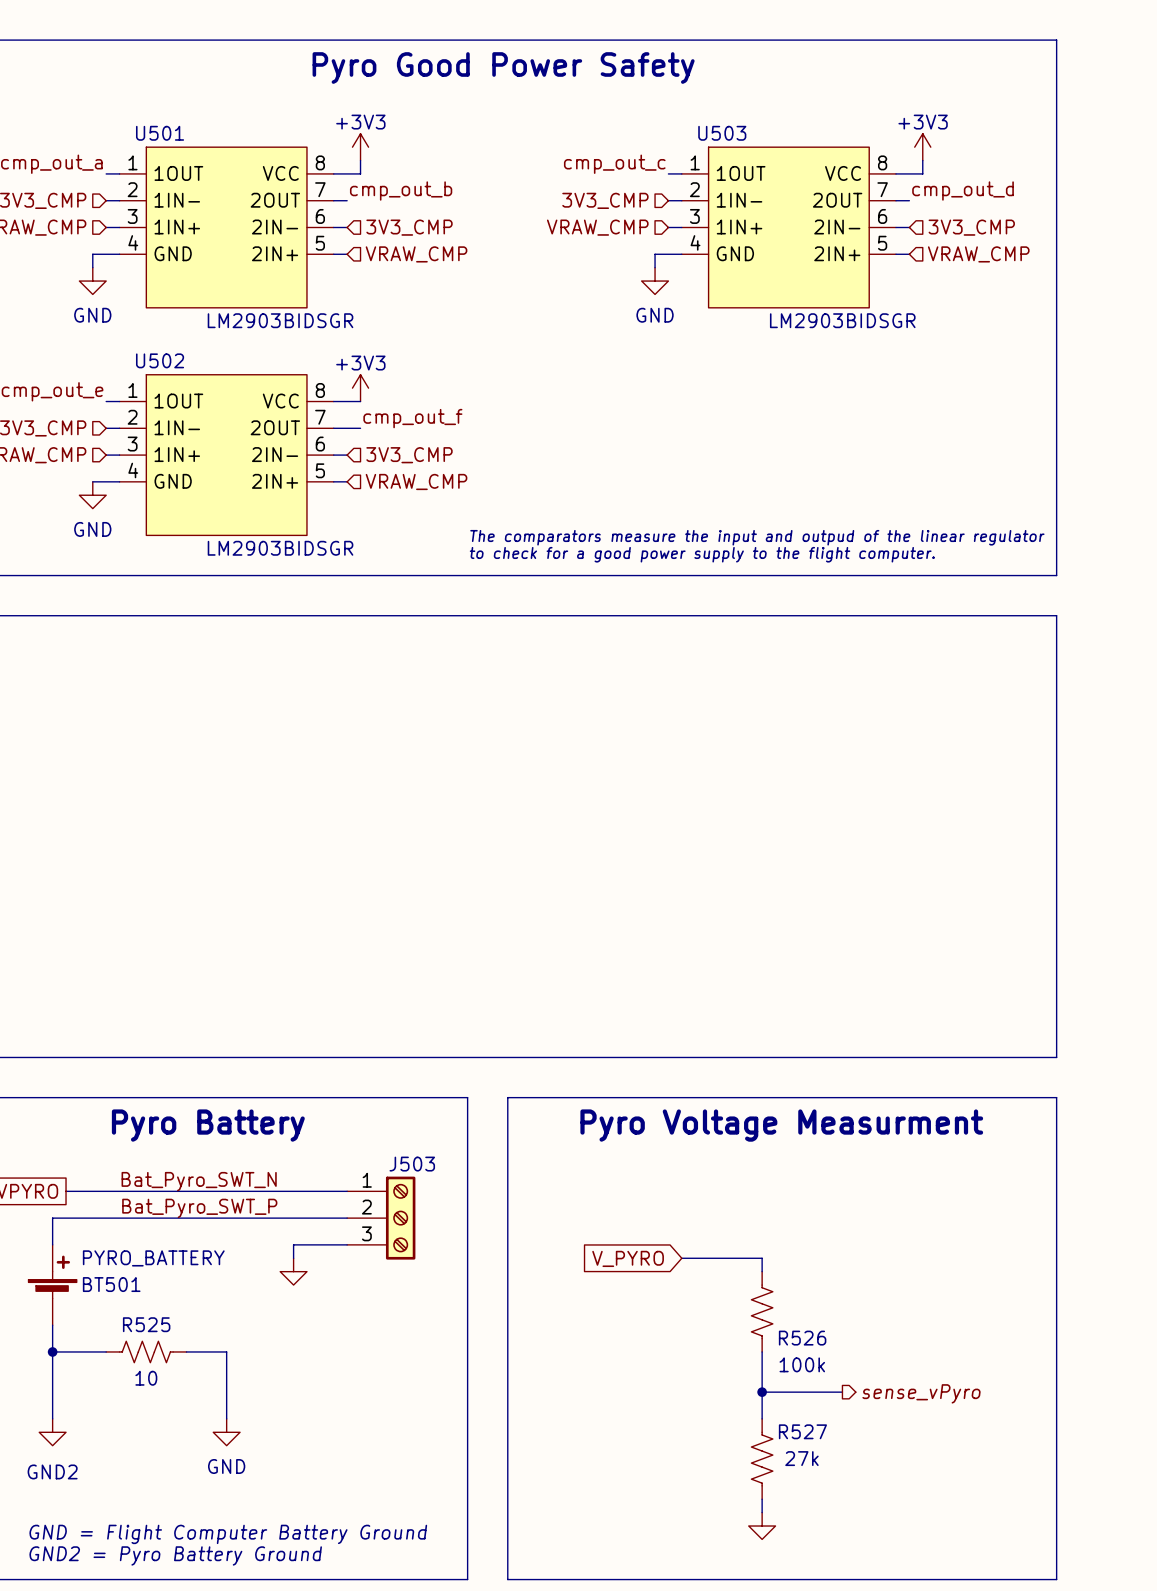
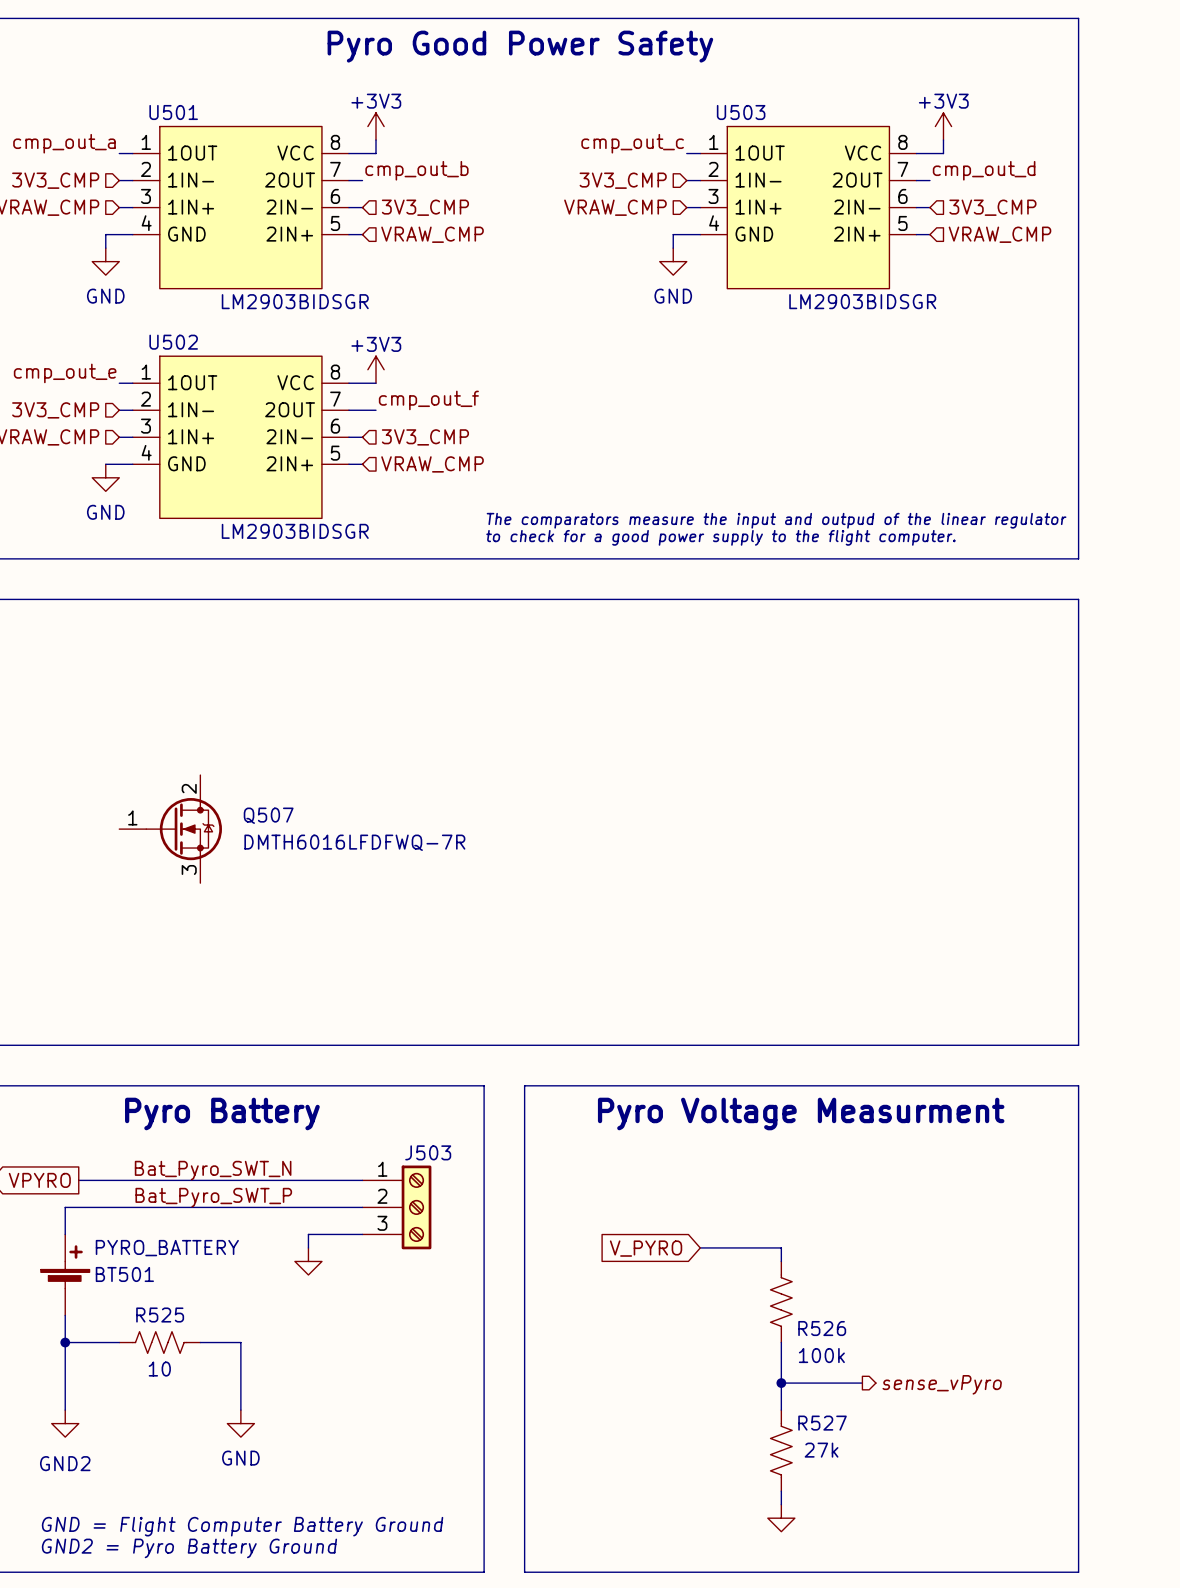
Q507: none -> DMTH6016LFDFWQ-7R (170, 829)

